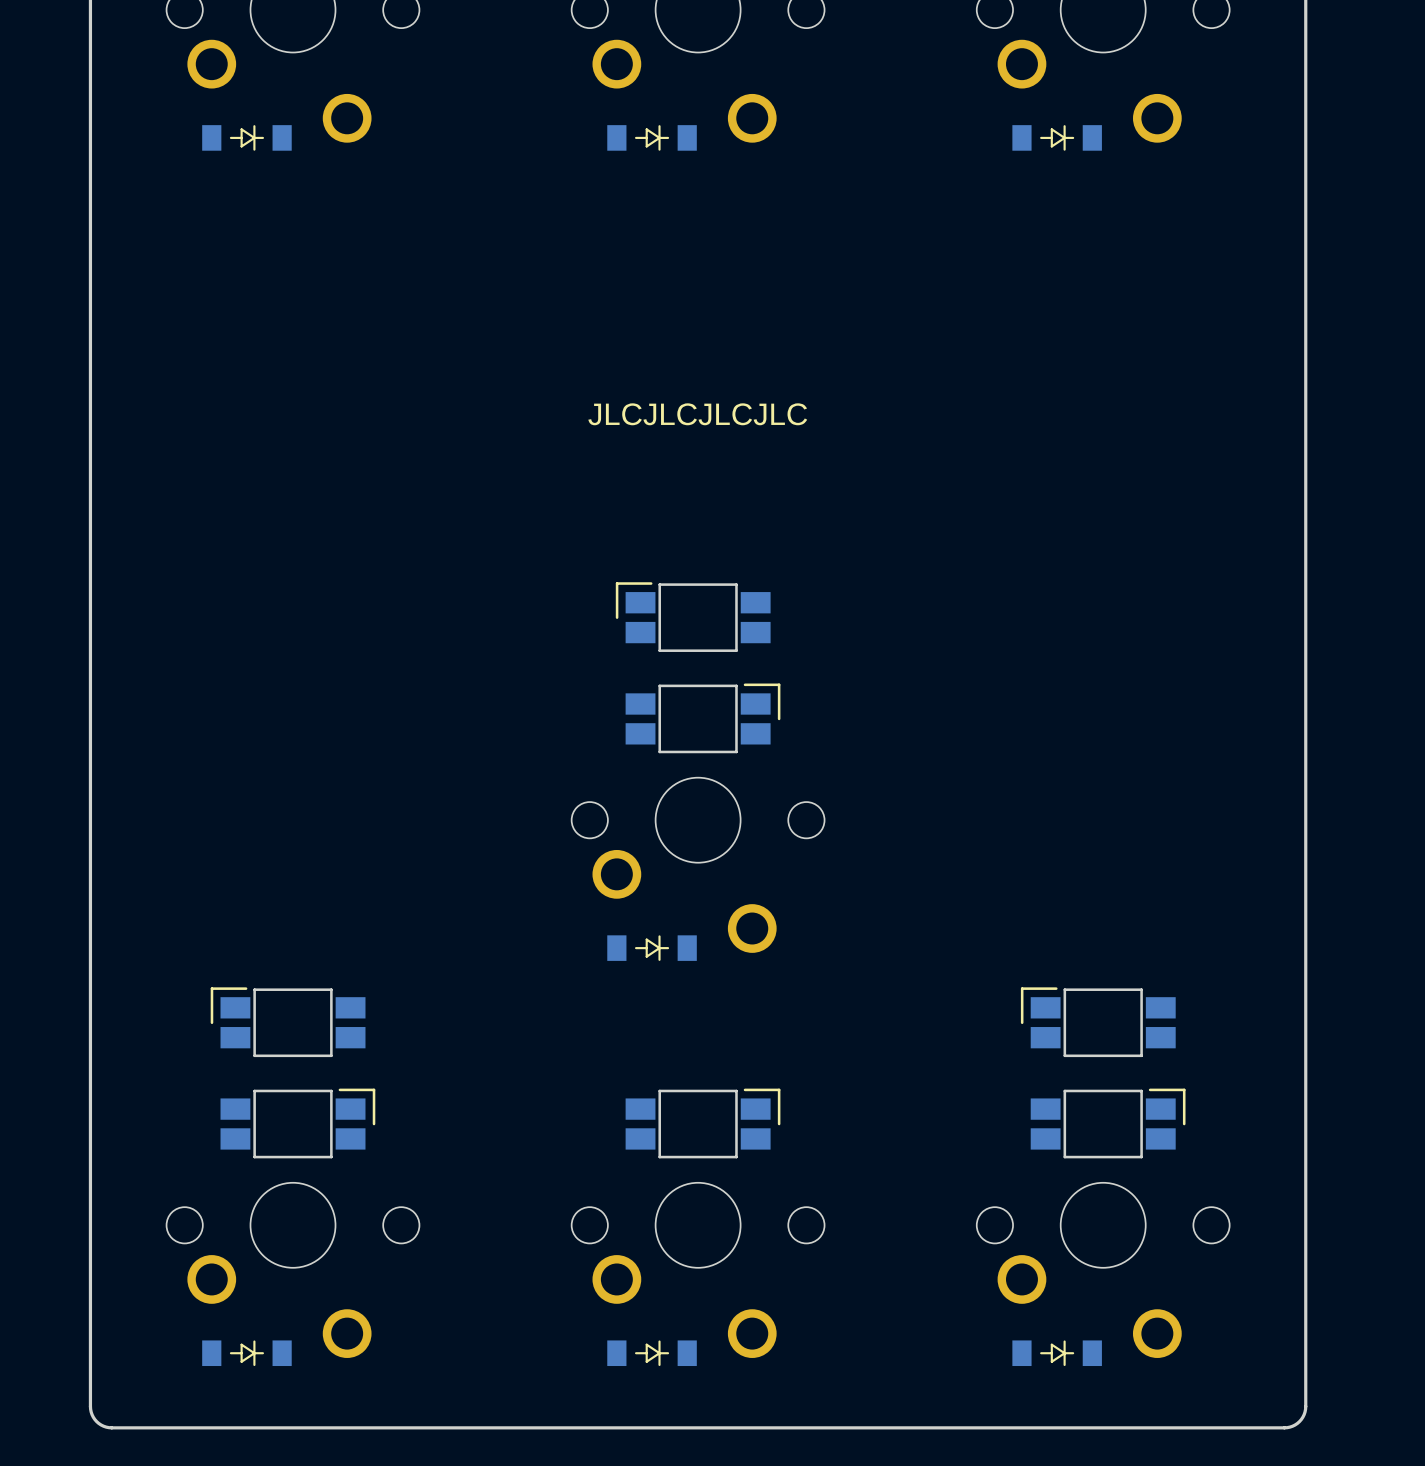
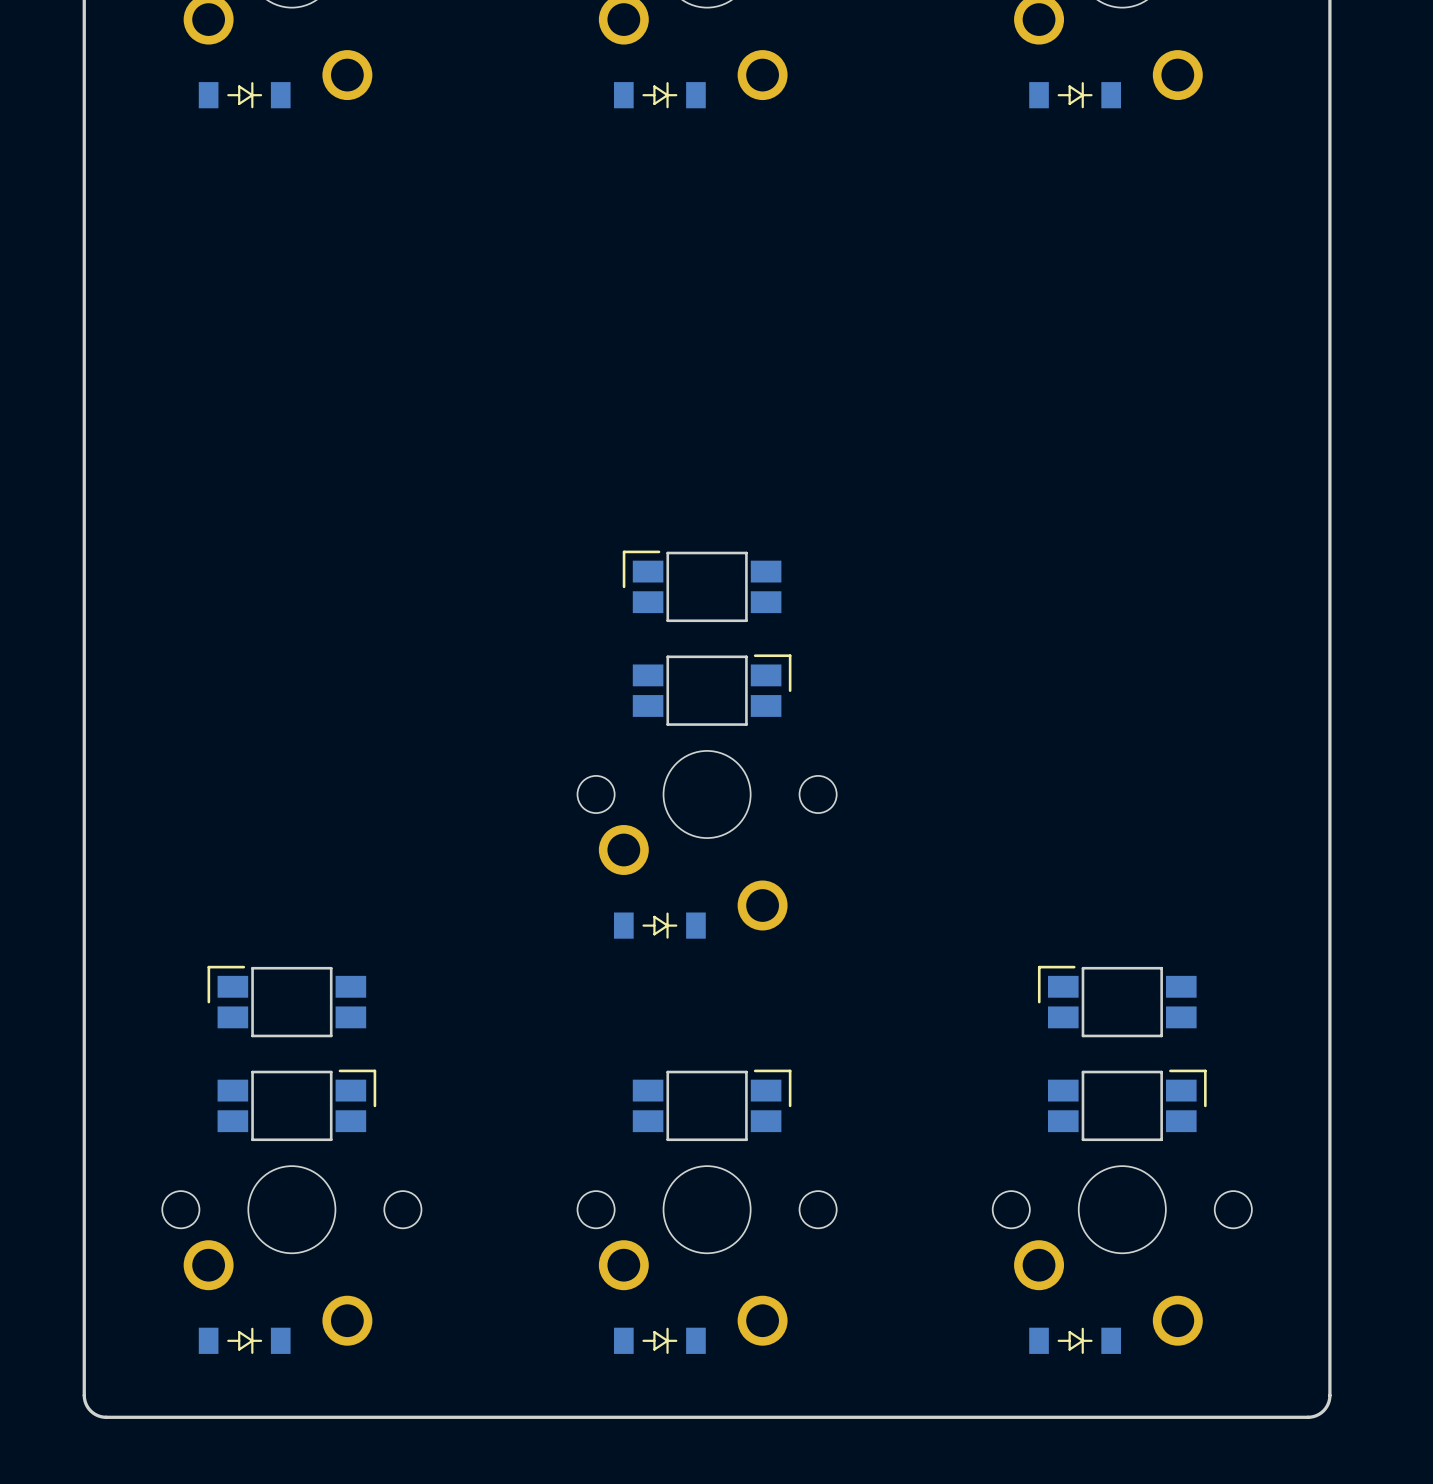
text: JLCJLCJLCJLC (697, 414) -> none

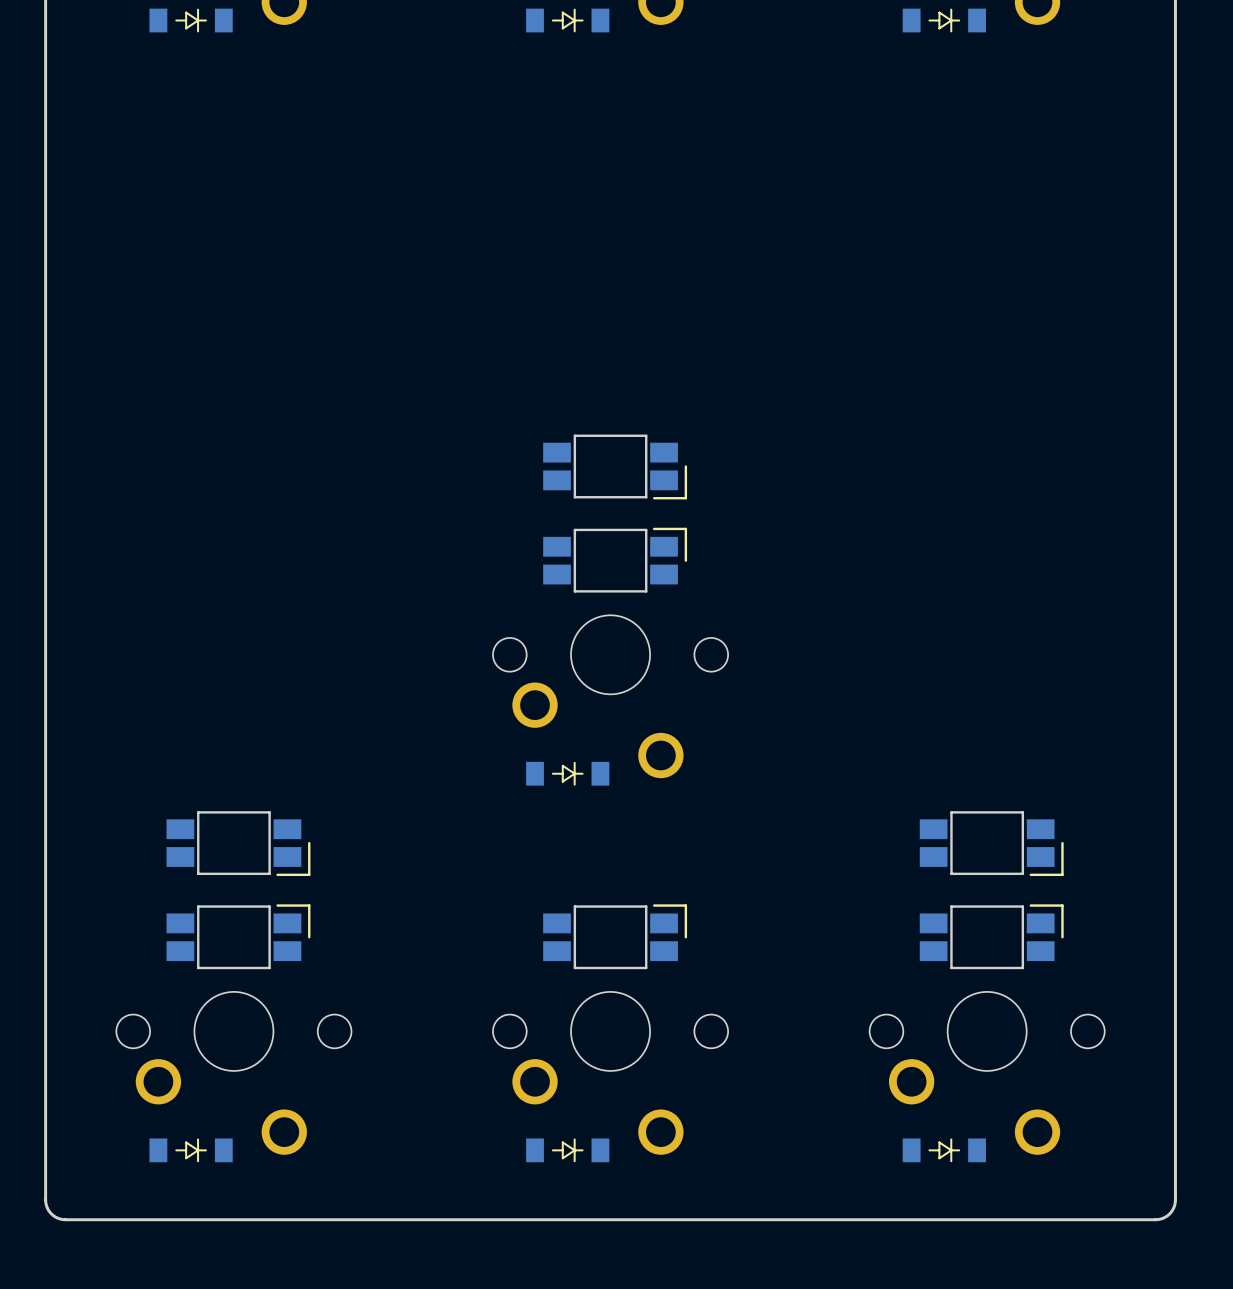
part rotation: 0° (702, 586) -> 180° (615, 466)
part rotation: 0° (286, 1001) -> 180° (238, 843)
part rotation: 0° (1117, 1001) -> 180° (991, 843)

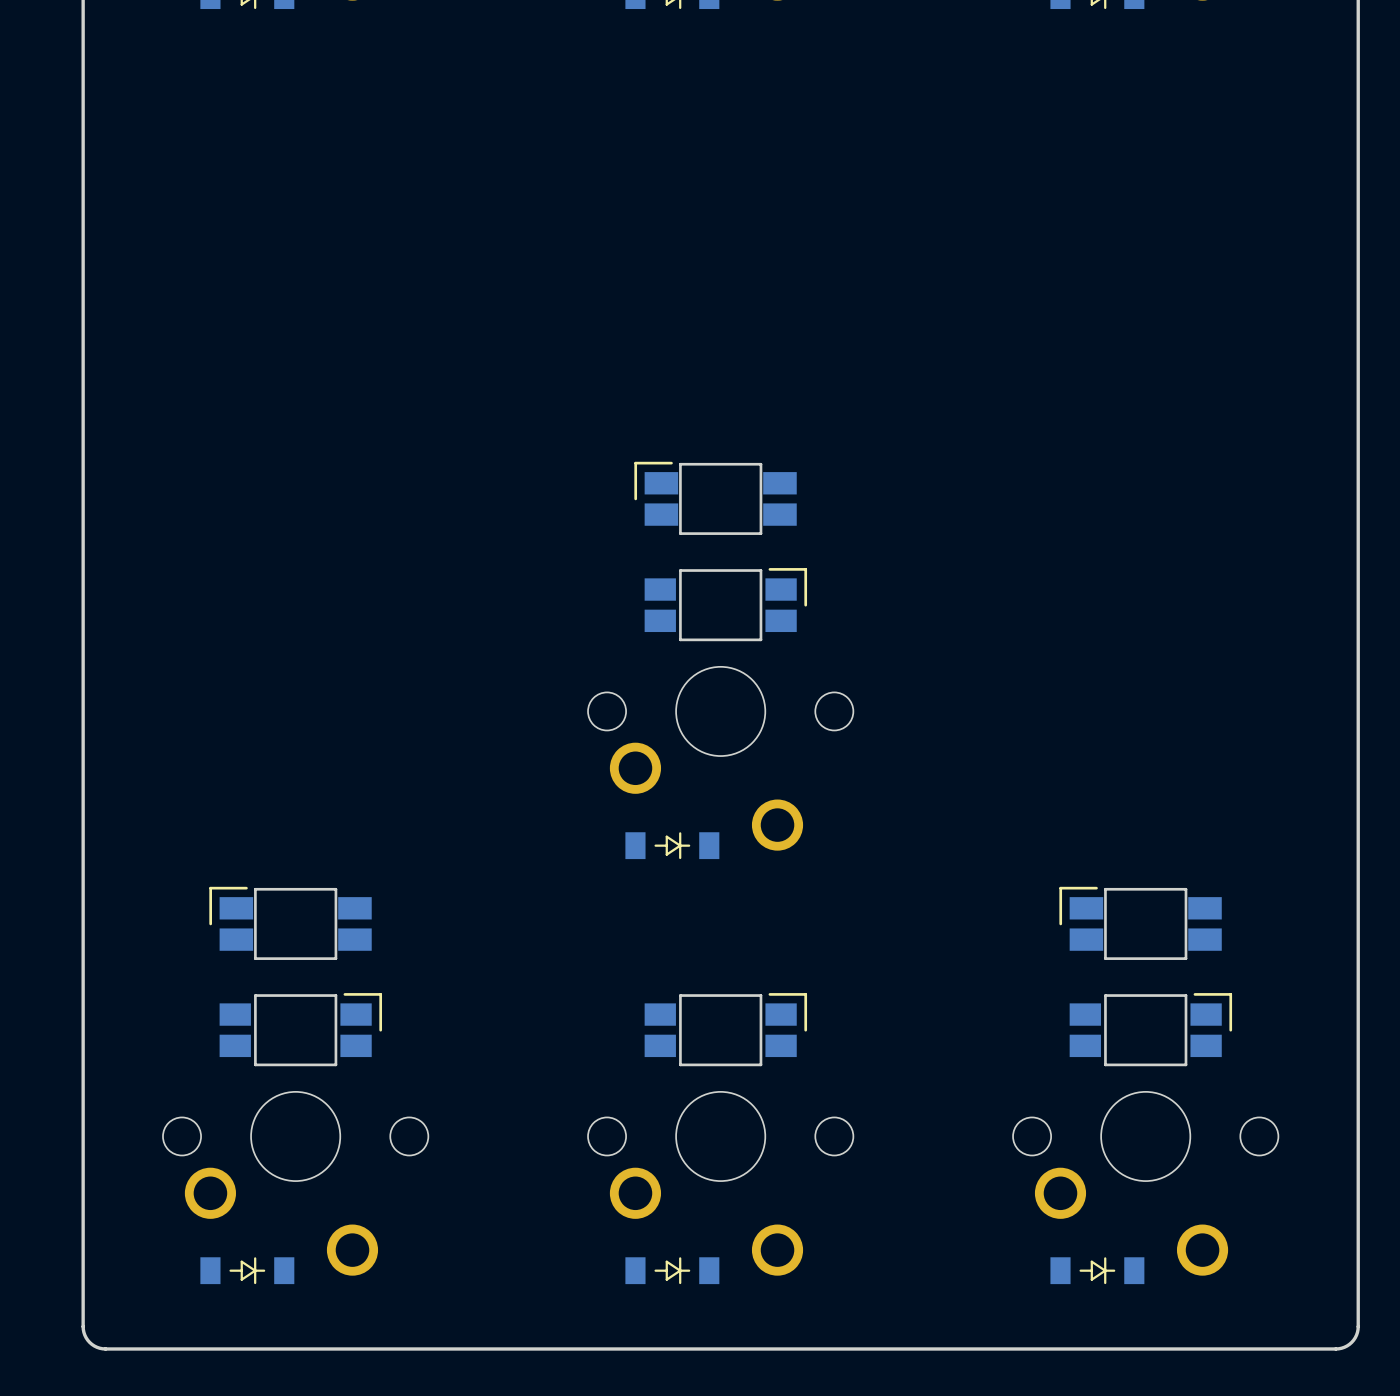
part footprint: [543, 434, 688, 500] -> [634, 461, 797, 535]
part footprint: [166, 811, 311, 877] -> [209, 886, 372, 960]
part footprint: [919, 811, 1064, 877] -> [1059, 886, 1222, 960]

